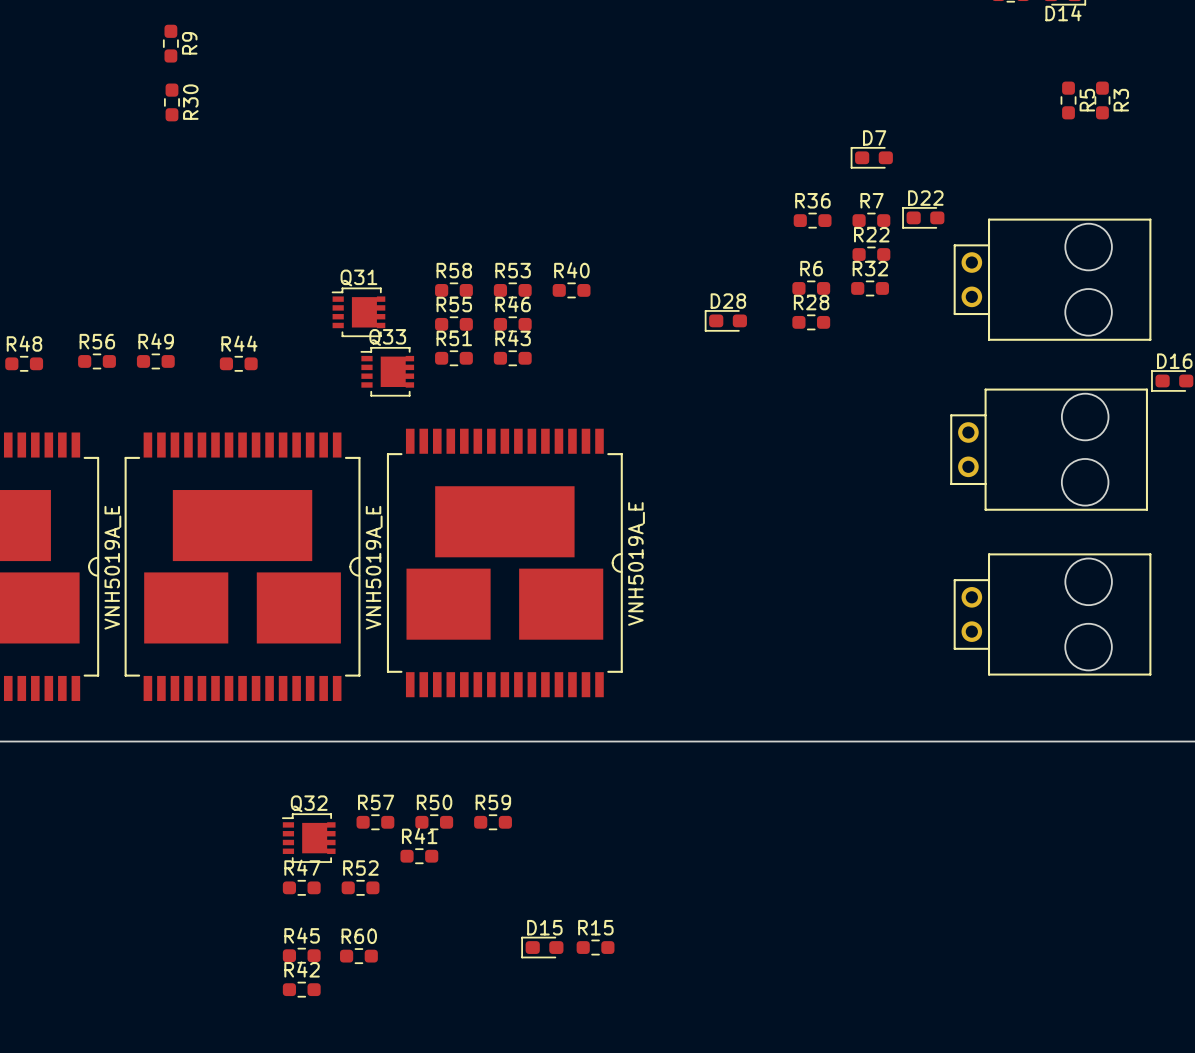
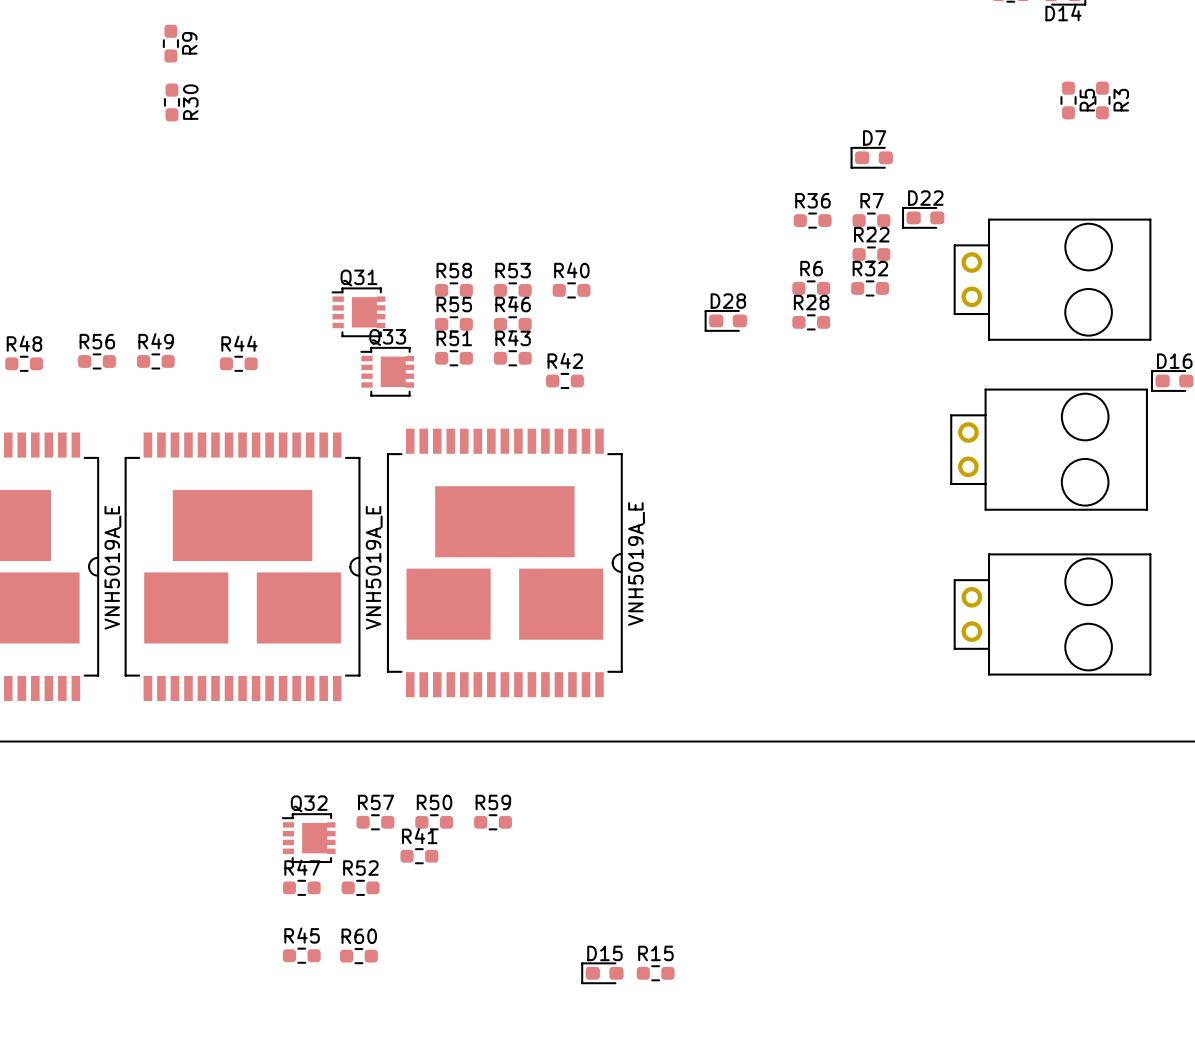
D15 position: (542, 947) -> (602, 973)
R15 position: (595, 947) -> (655, 973)
R42 position: (301, 989) -> (564, 380)

